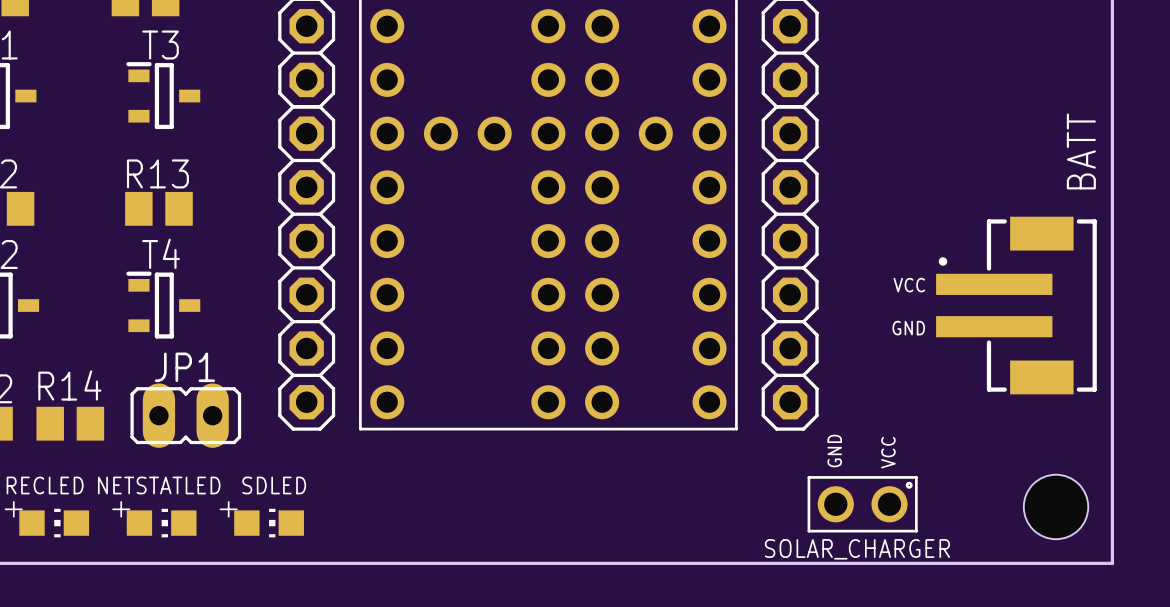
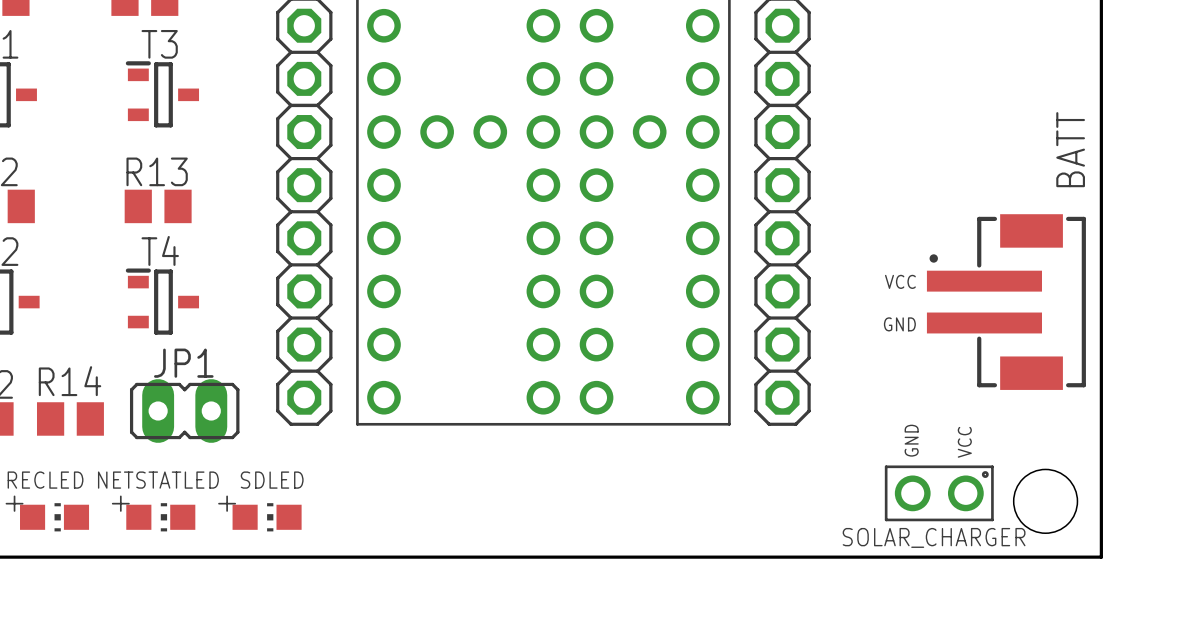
text position: GND (834, 451) -> GND (911, 440)
text position: VCC (888, 452) -> VCC (964, 442)
SOLAR_CHARGER position: (862, 504) -> (939, 493)

